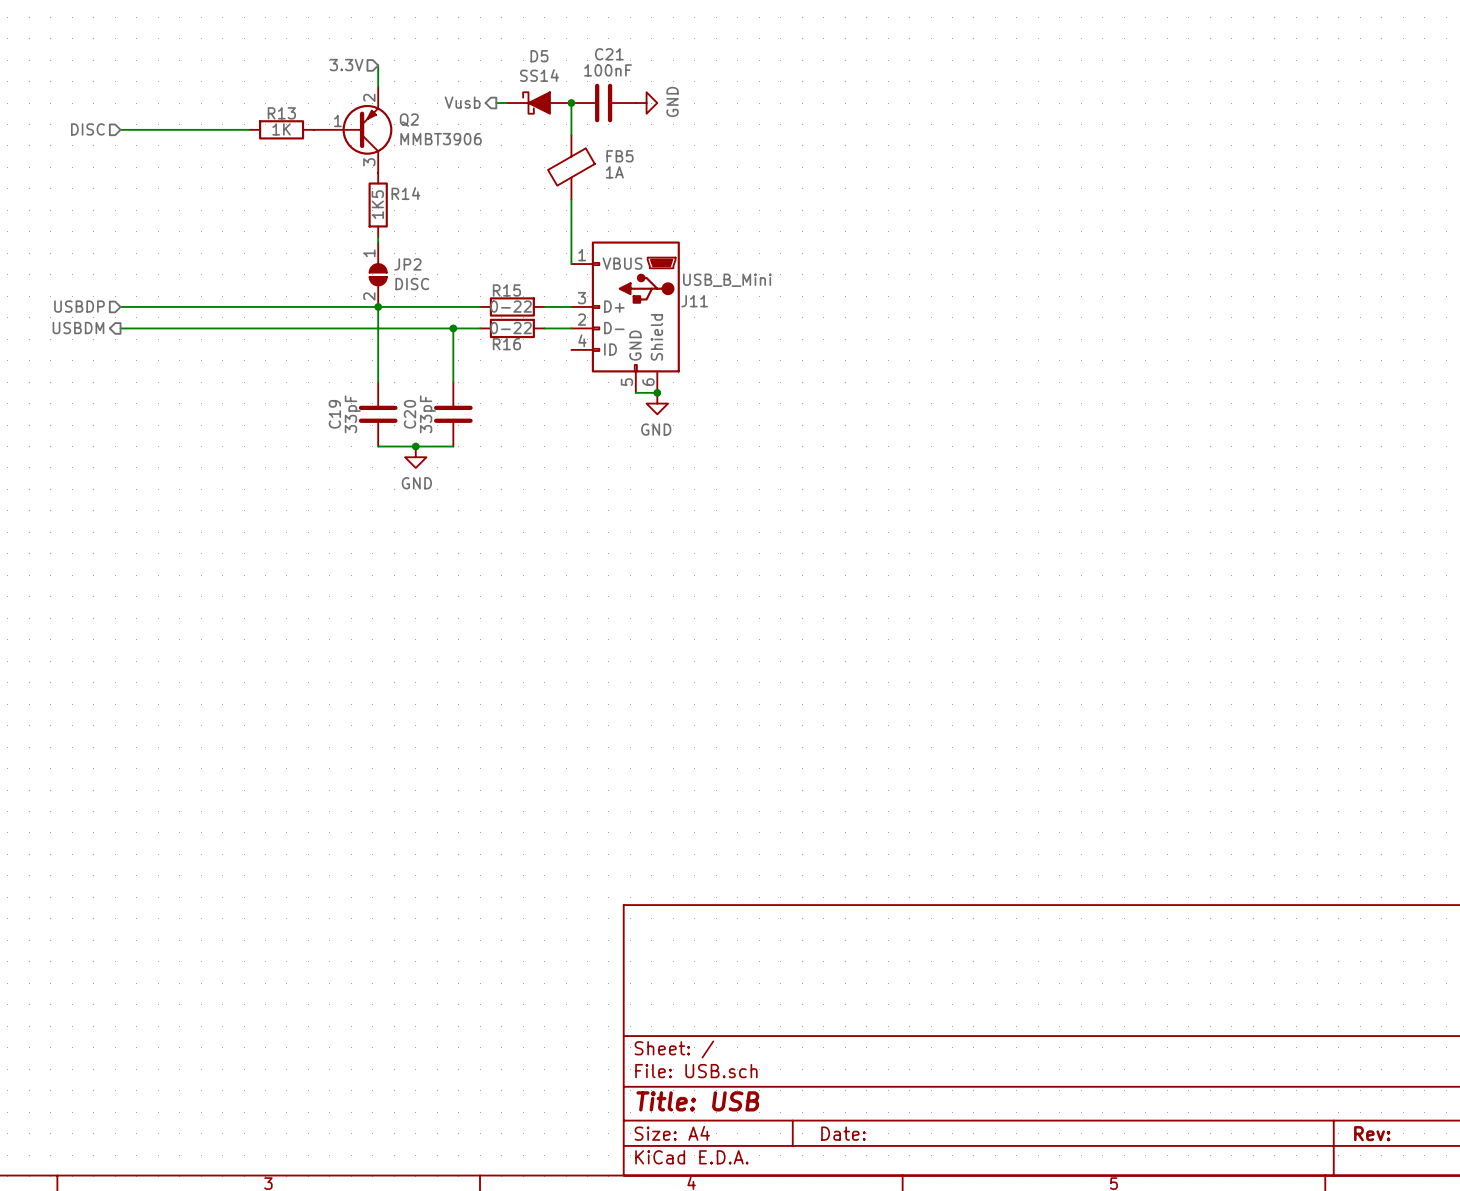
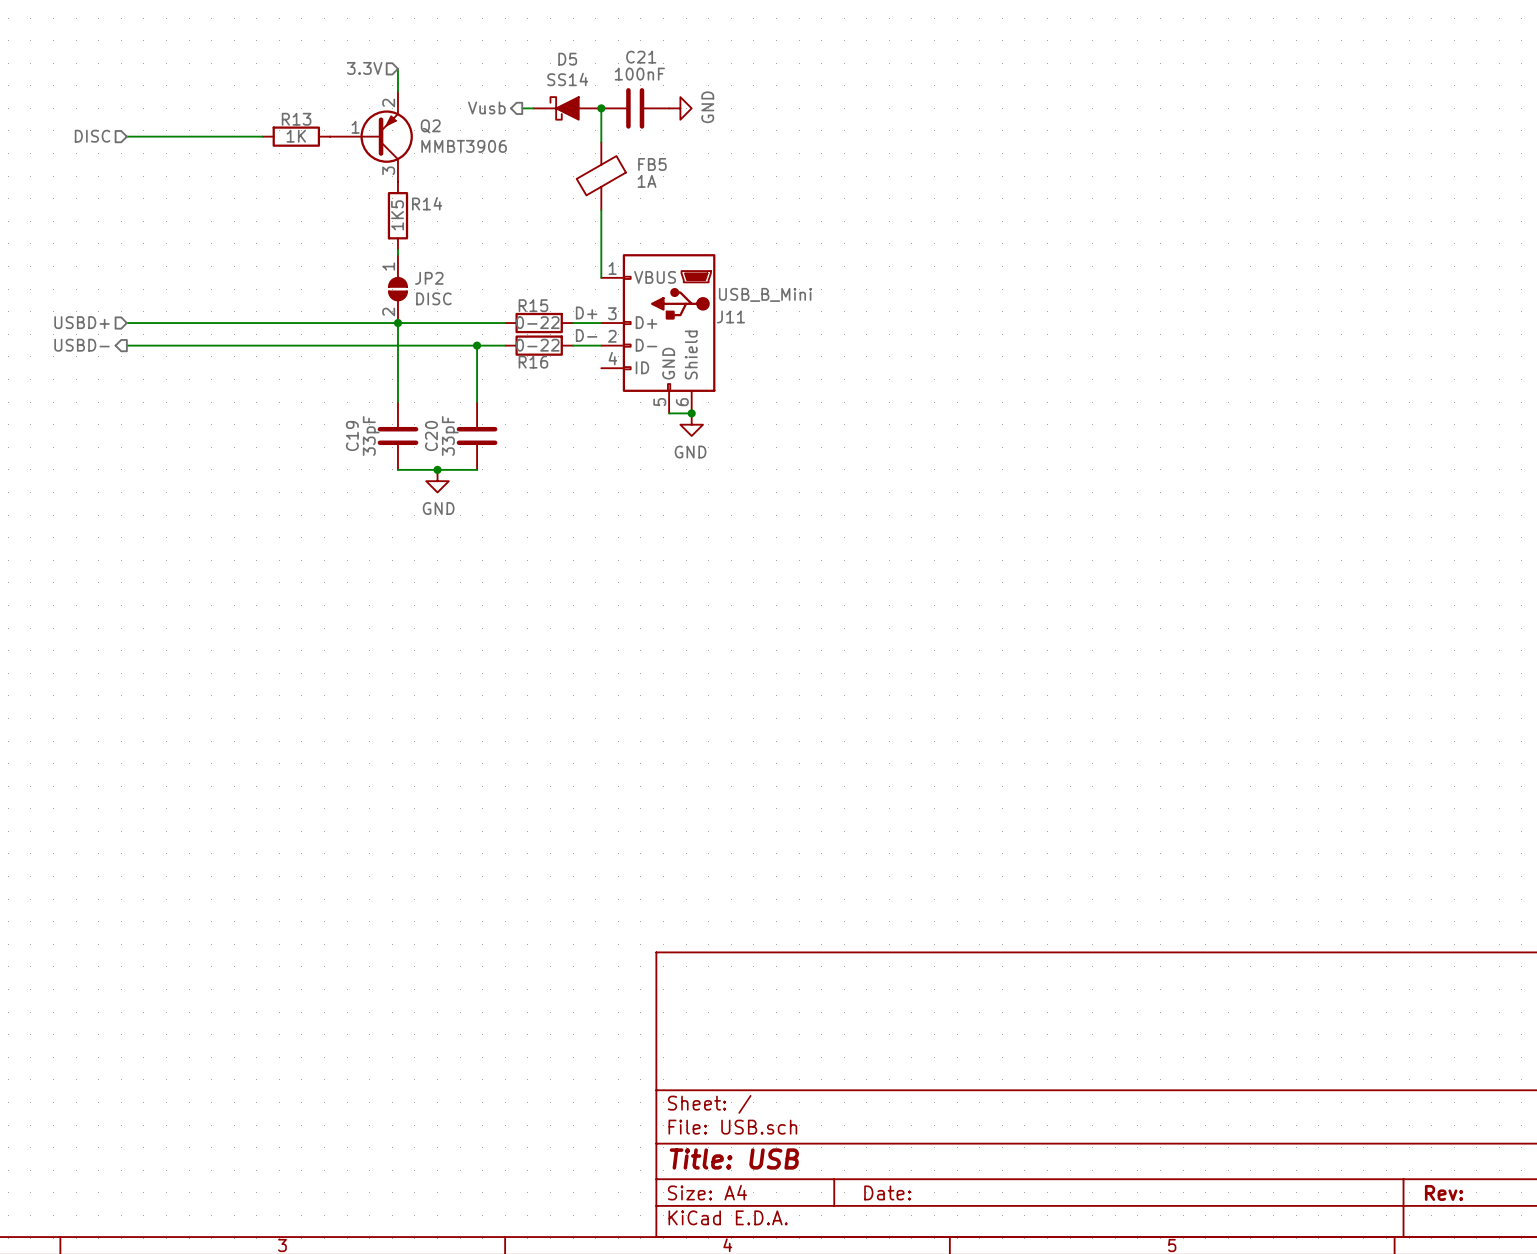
label: none -> D+ (586, 312)
hierarchical label: USBDP (79, 306) -> USBD+ (82, 322)
label: none -> D- (586, 335)
hierarchical label: USBDM (78, 328) -> USBD- (82, 345)

